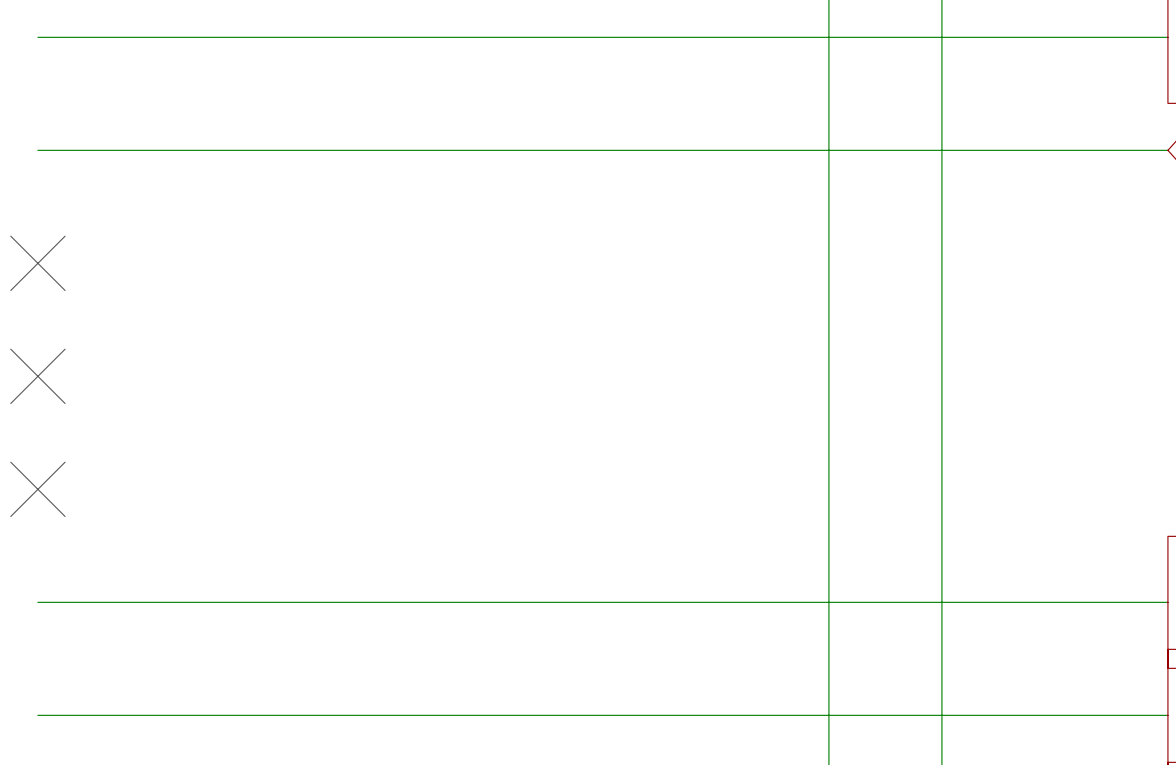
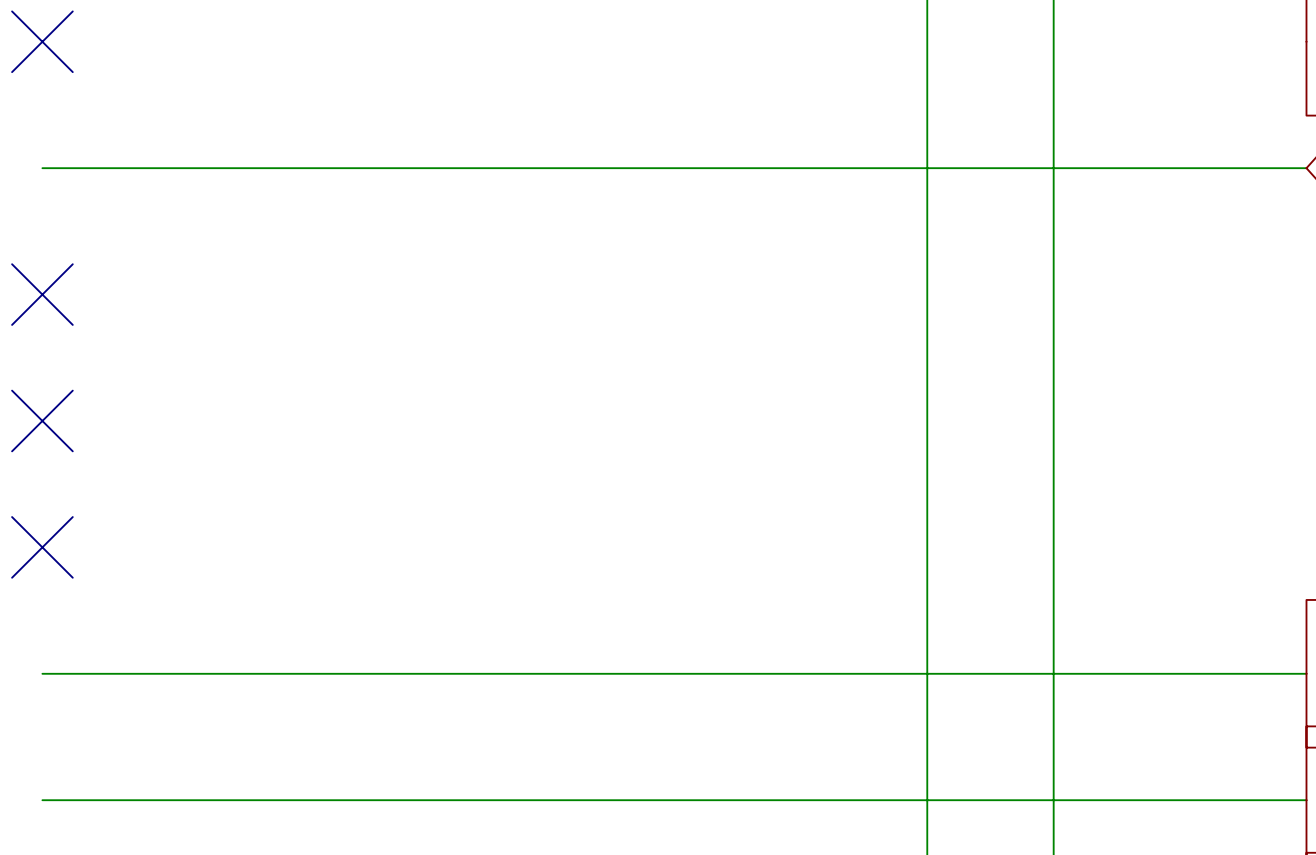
wire: (37, 37) (1167, 37) -> none
no-connect mark: none -> (42, 41)

